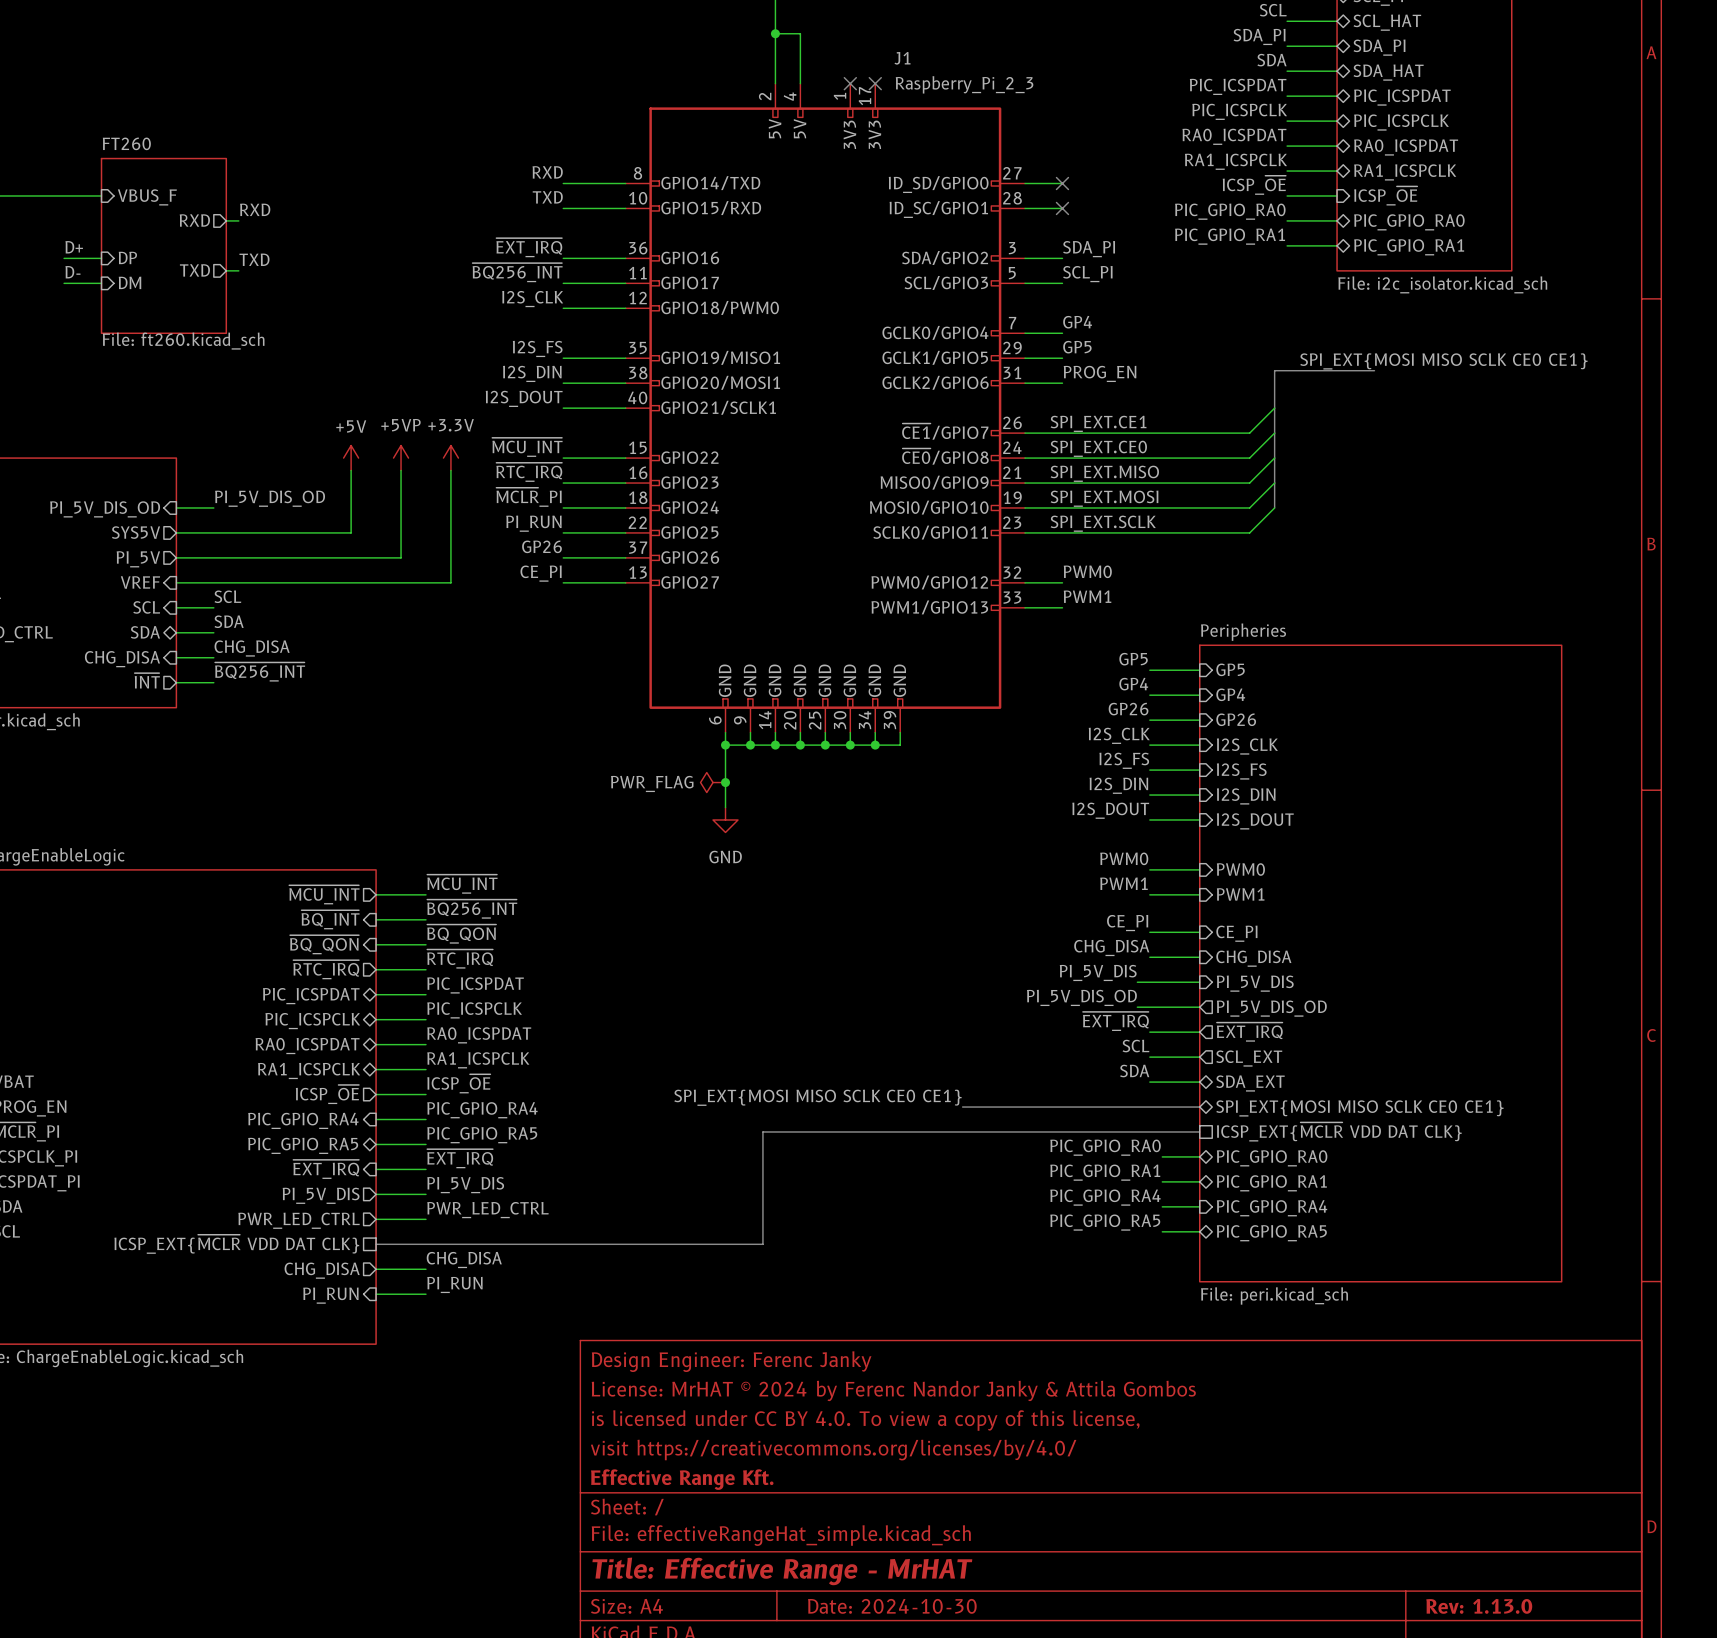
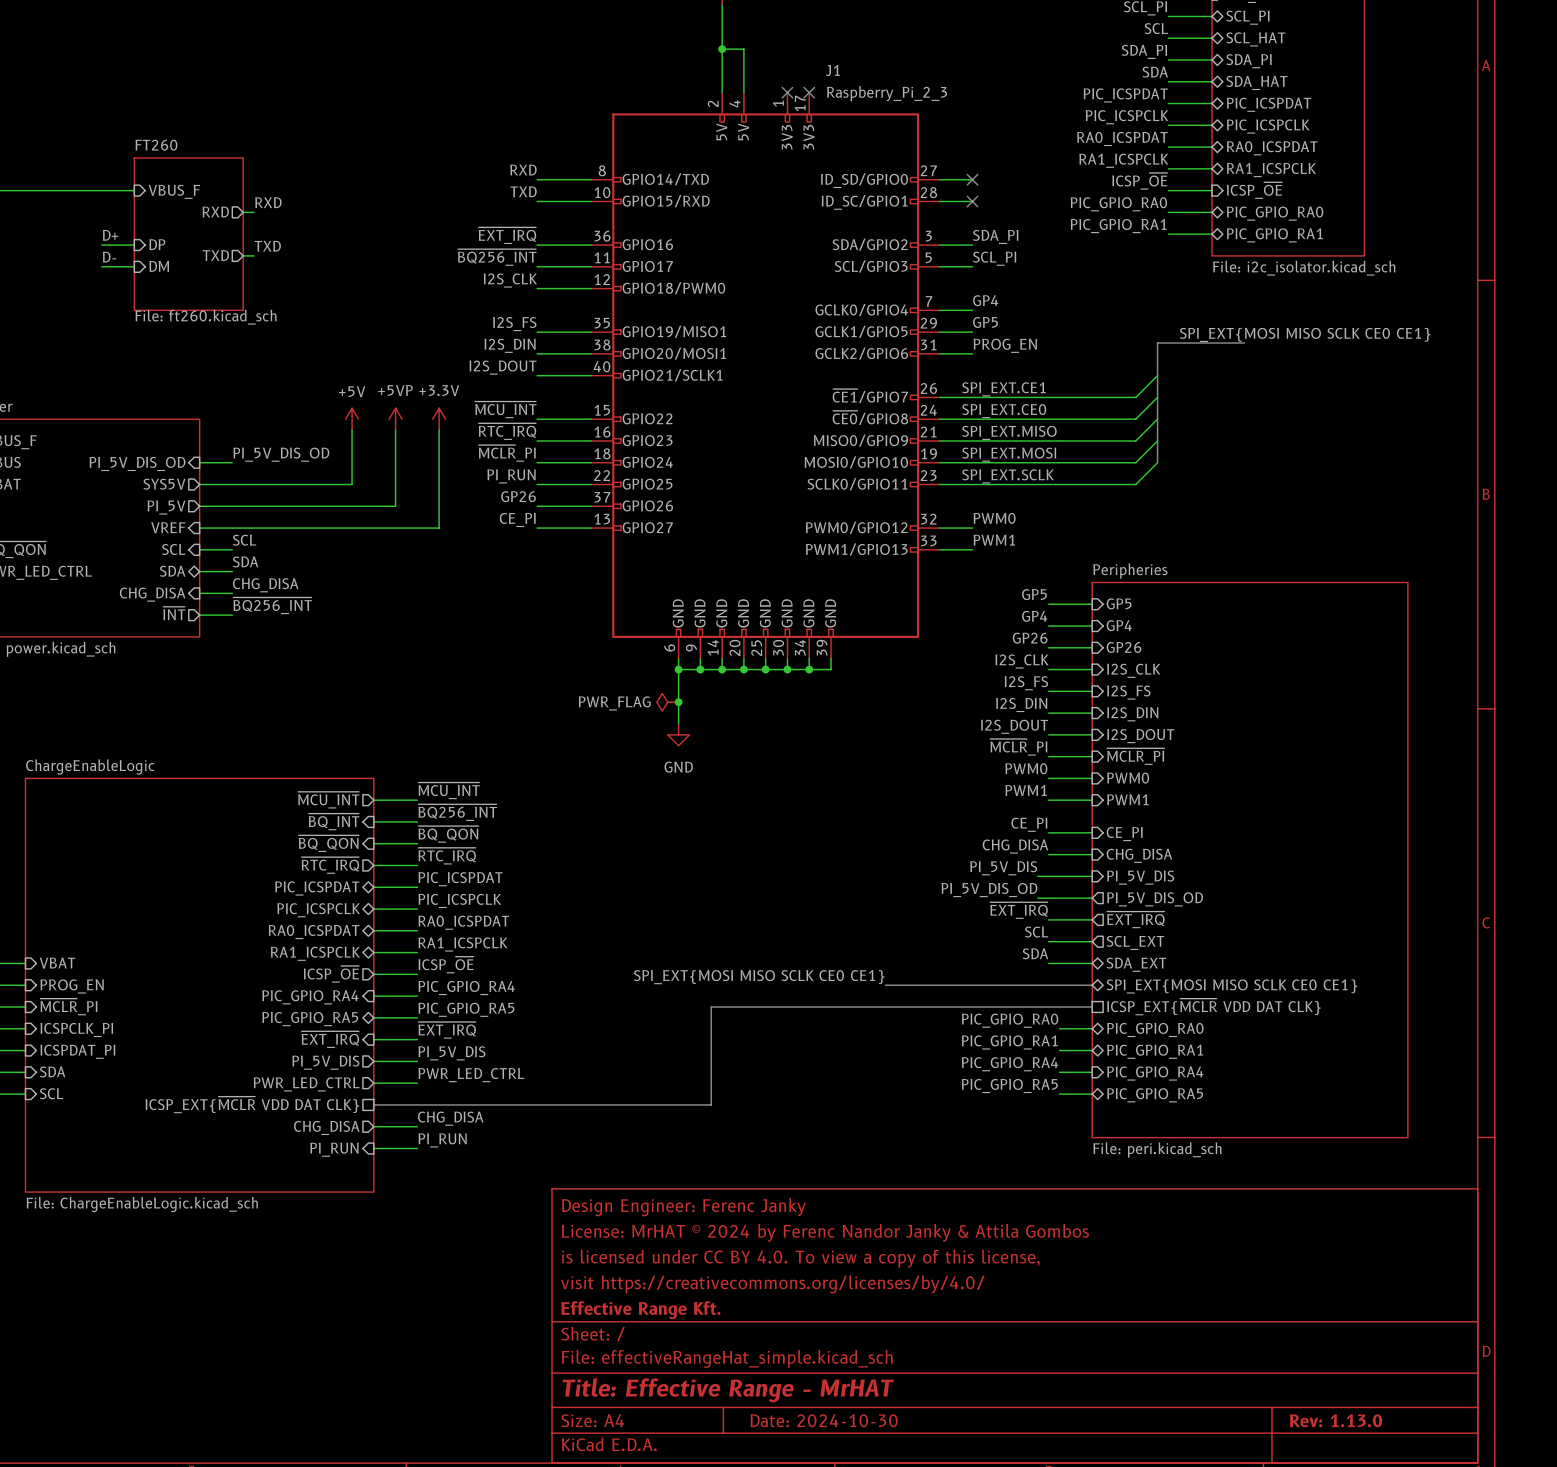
label: none -> ~{MCLR}_PI (1018, 747)
wire: none -> (1048, 756) (1092, 756)
sheet pin: none -> ~{MCLR_PI} (1135, 756)

